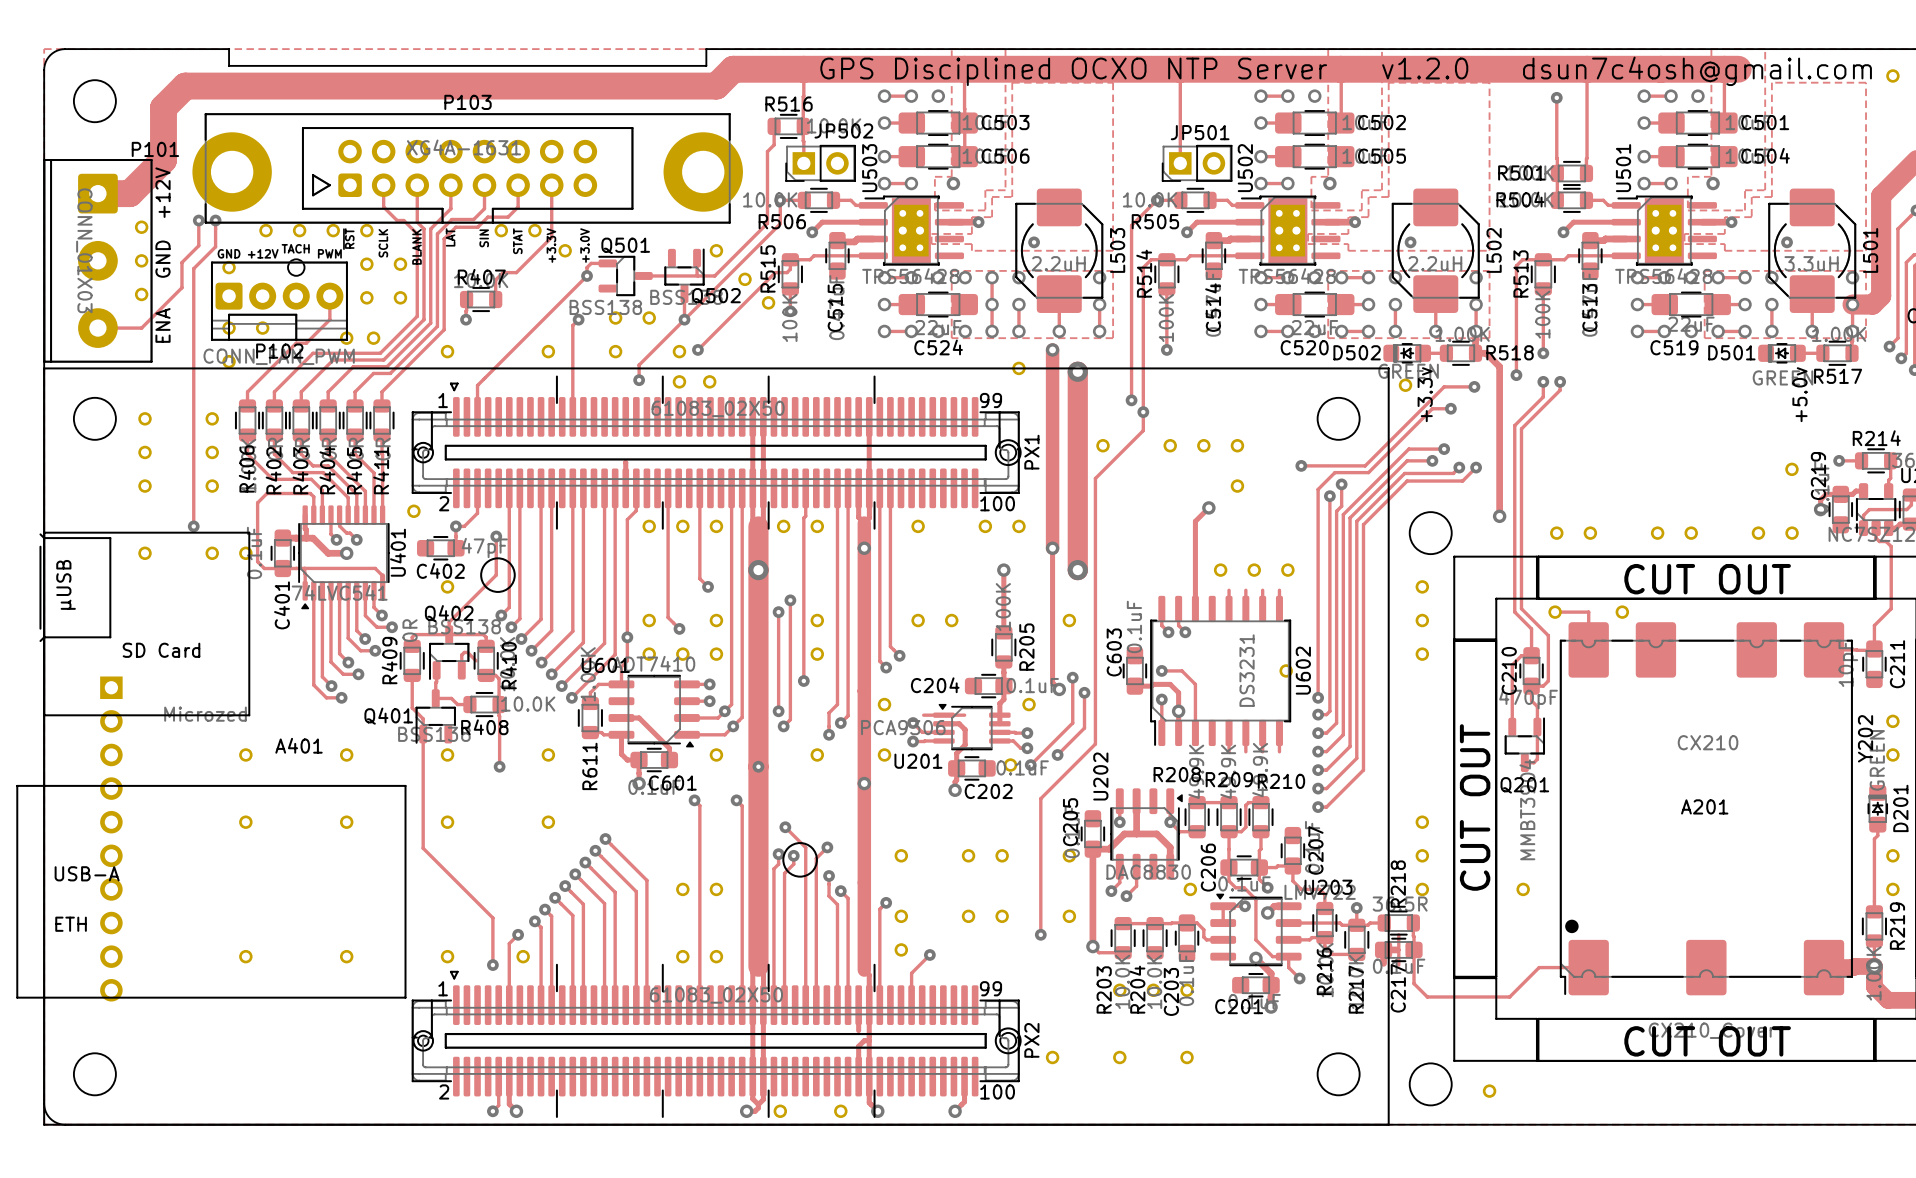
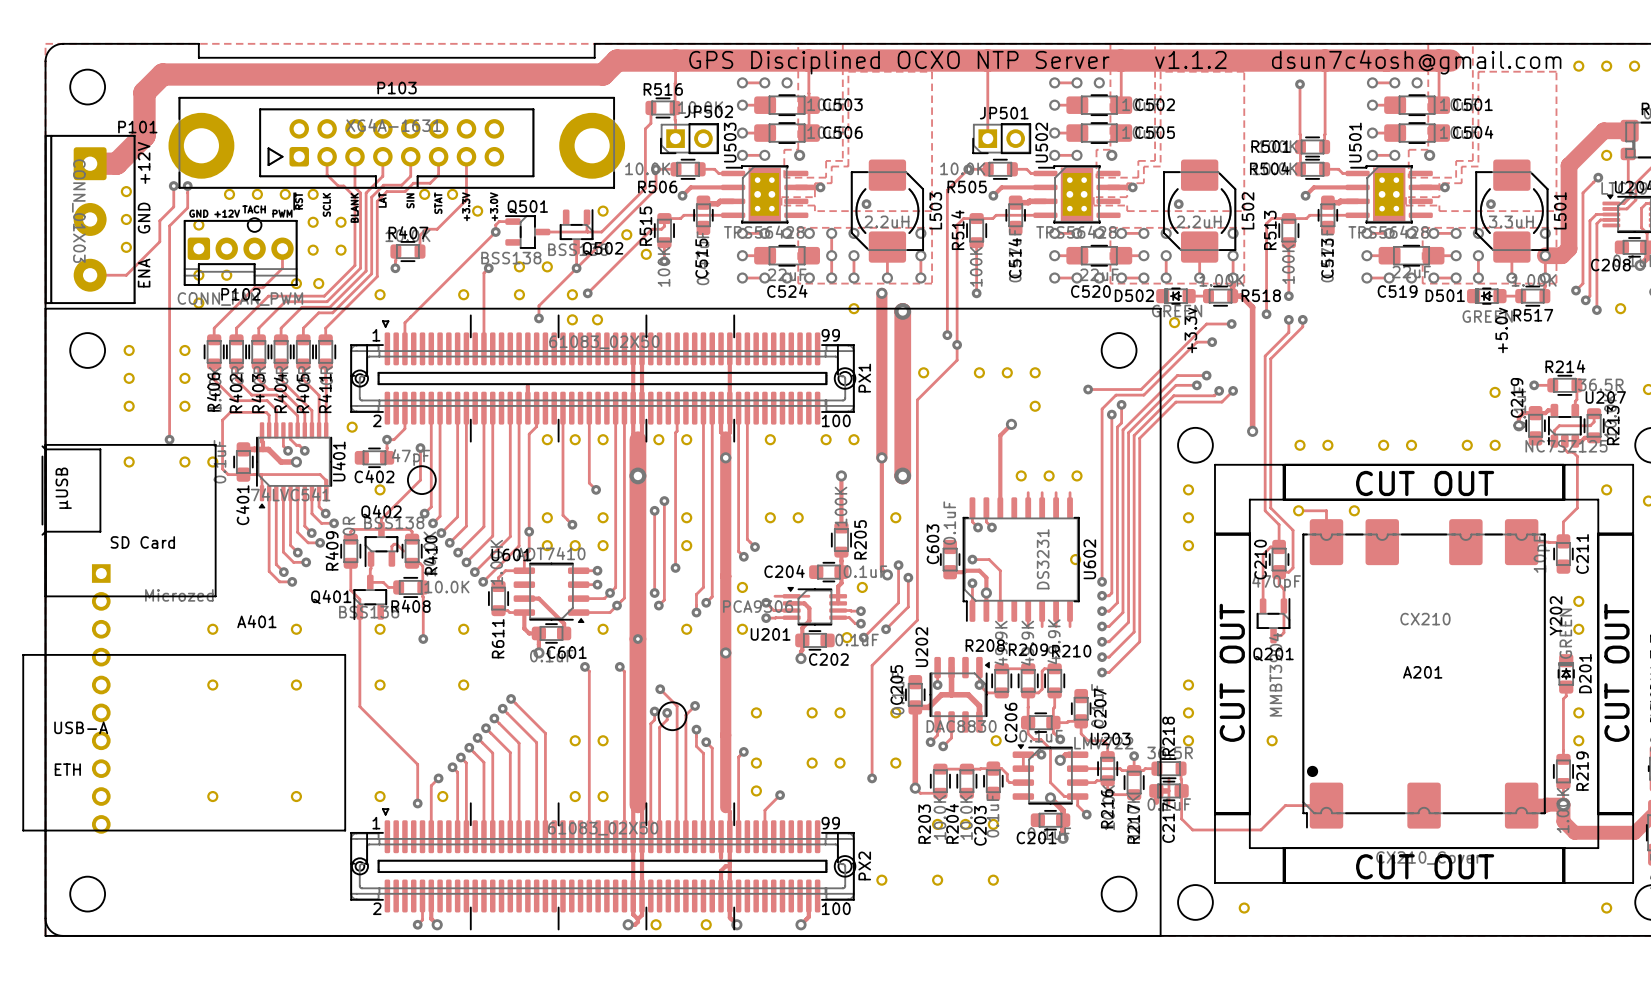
text: v1.2.0 (1425, 68) -> v1.1.2 (1190, 59)

